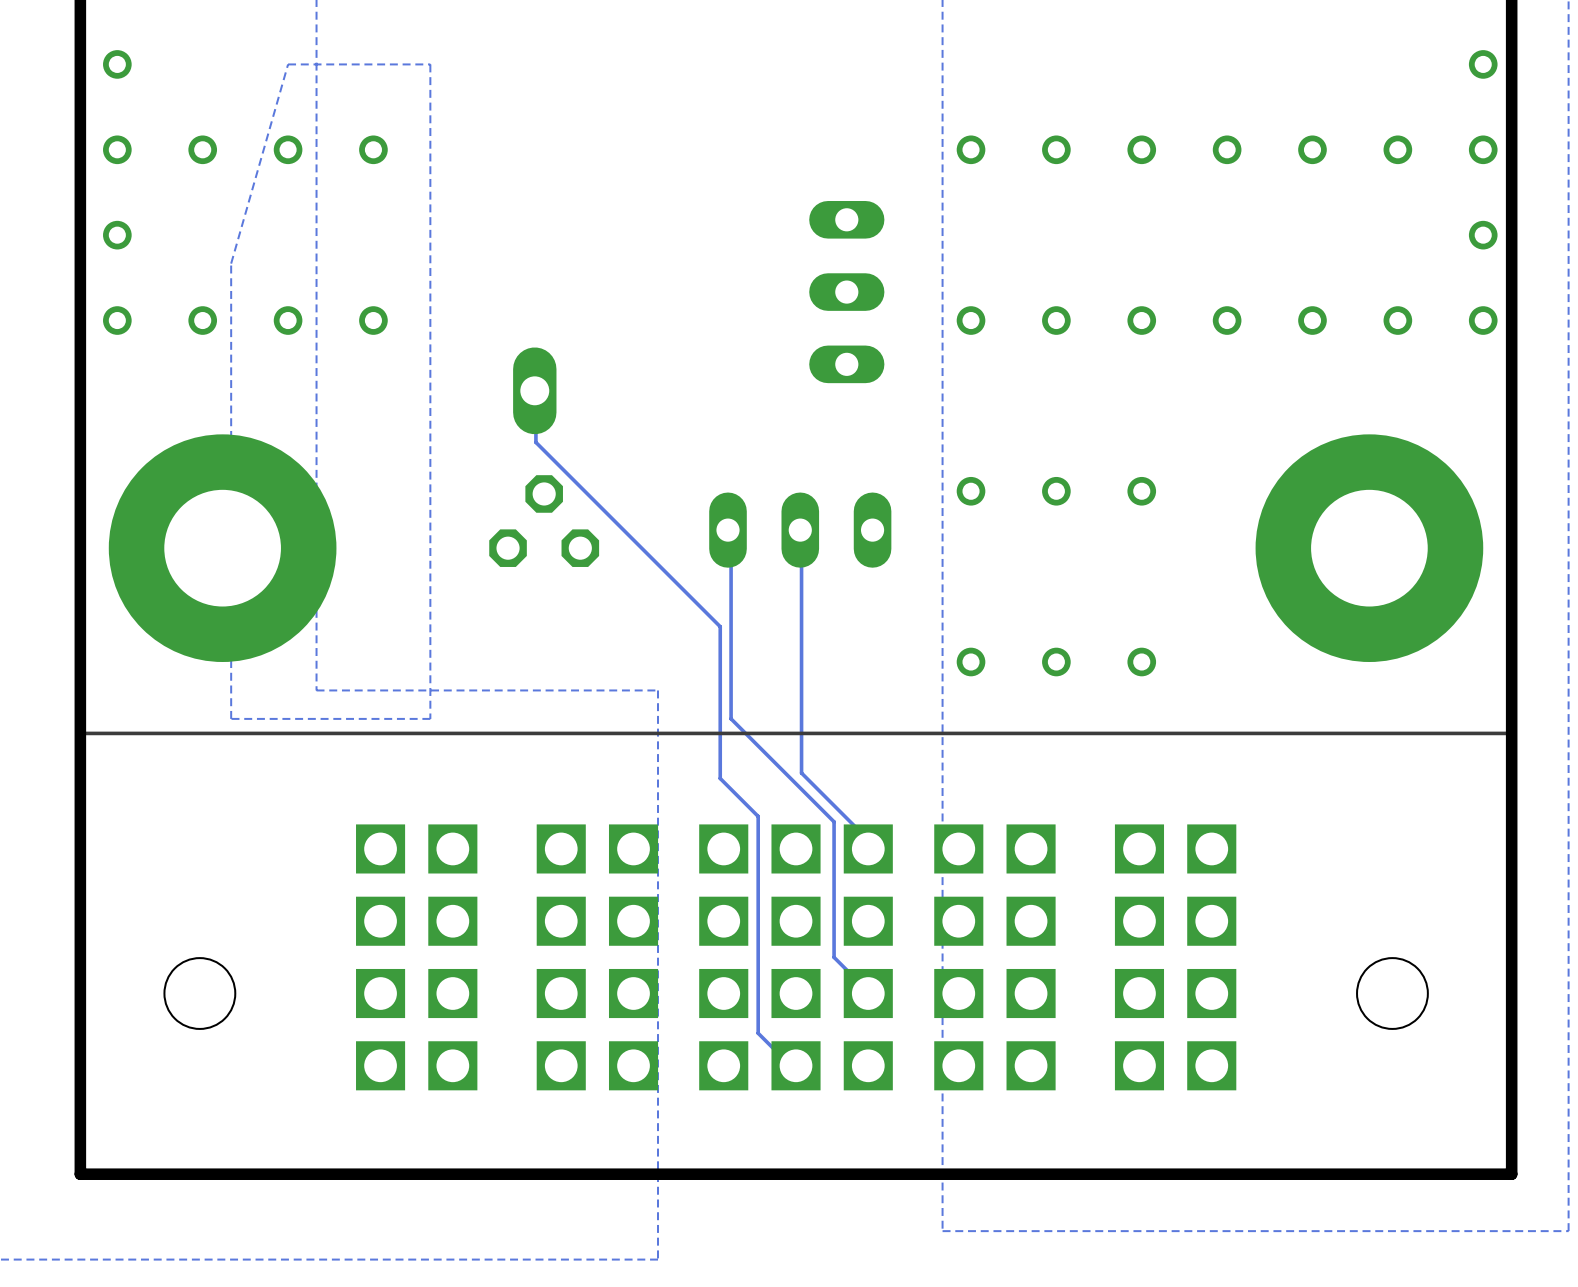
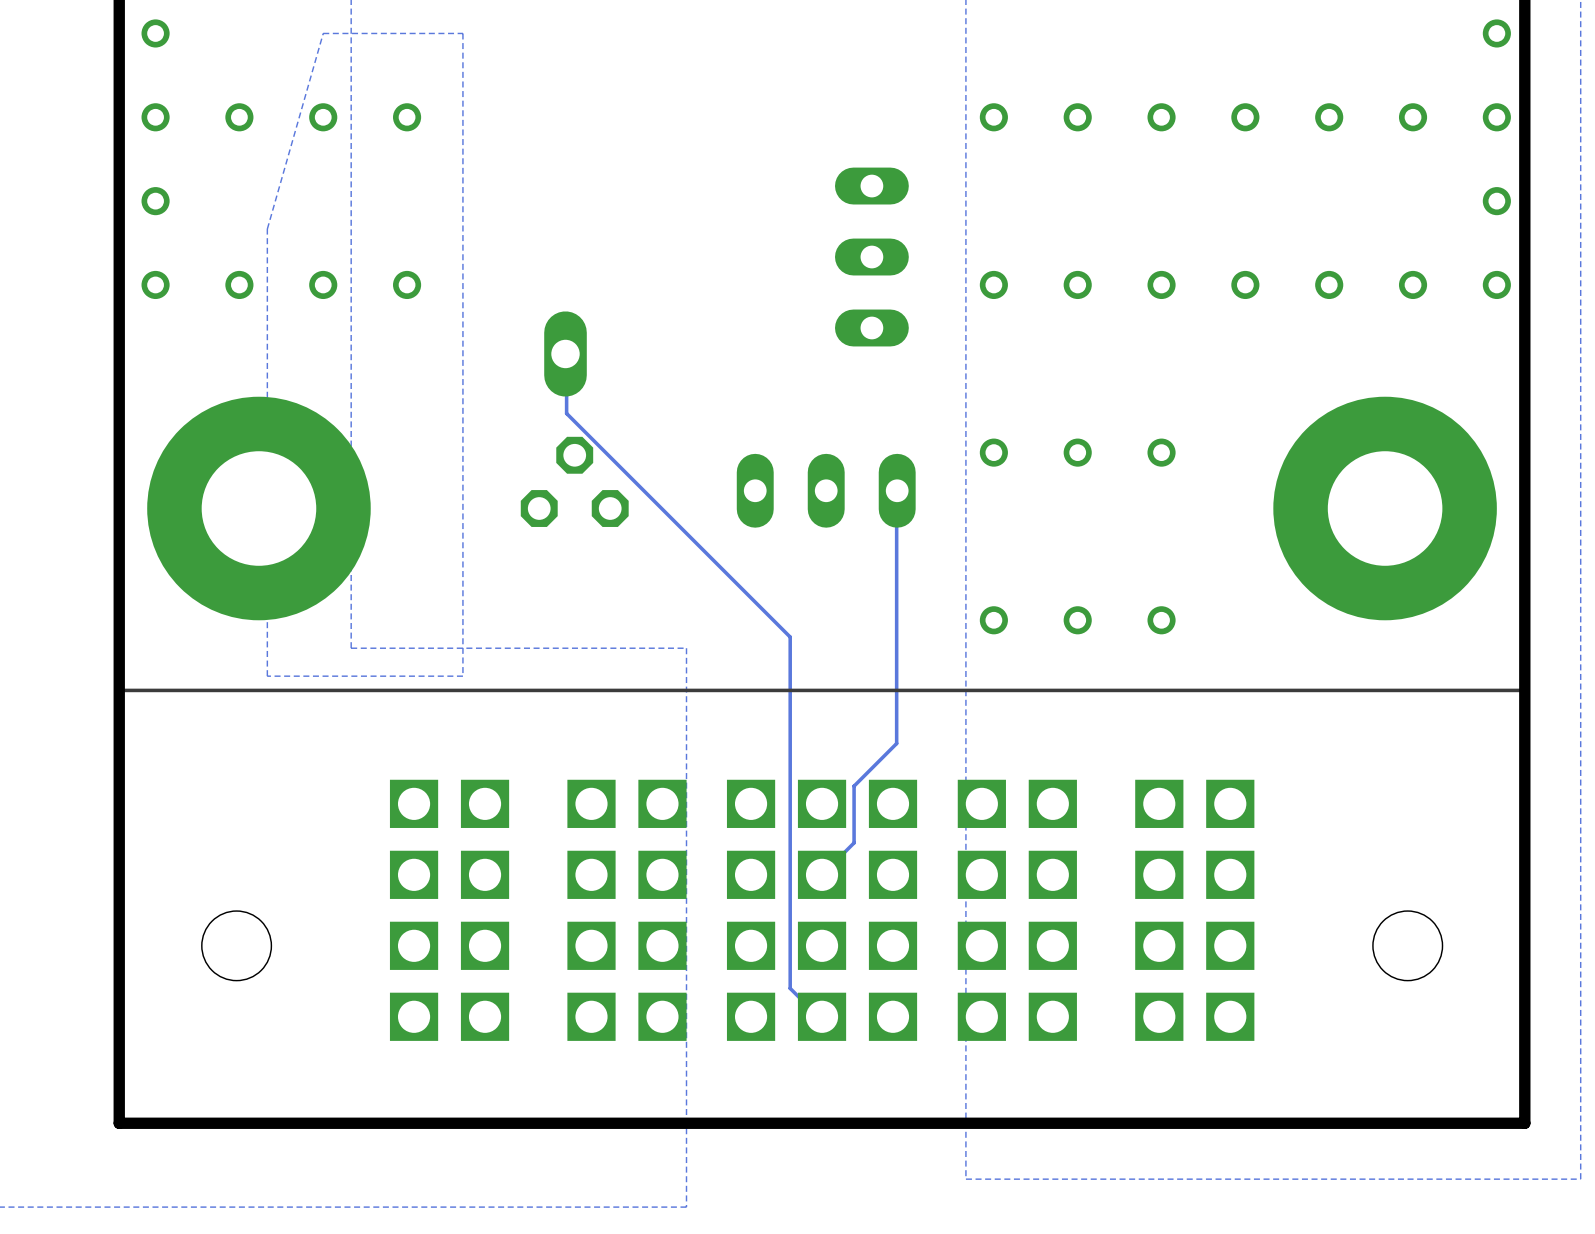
track: (535, 442) (720, 626) (720, 778) (758, 816) (758, 1033) (792, 1065) -> (566, 404) (566, 413) (790, 637) (790, 988) (818, 1016)
track: (728, 530) (731, 534) (731, 718) (834, 821) (834, 957) (868, 993) -> none
track: (800, 530) (801, 773) (866, 838) (866, 848) (868, 848) -> none
track: none -> (897, 490) (896, 743) (854, 786) (854, 842) (822, 874)

